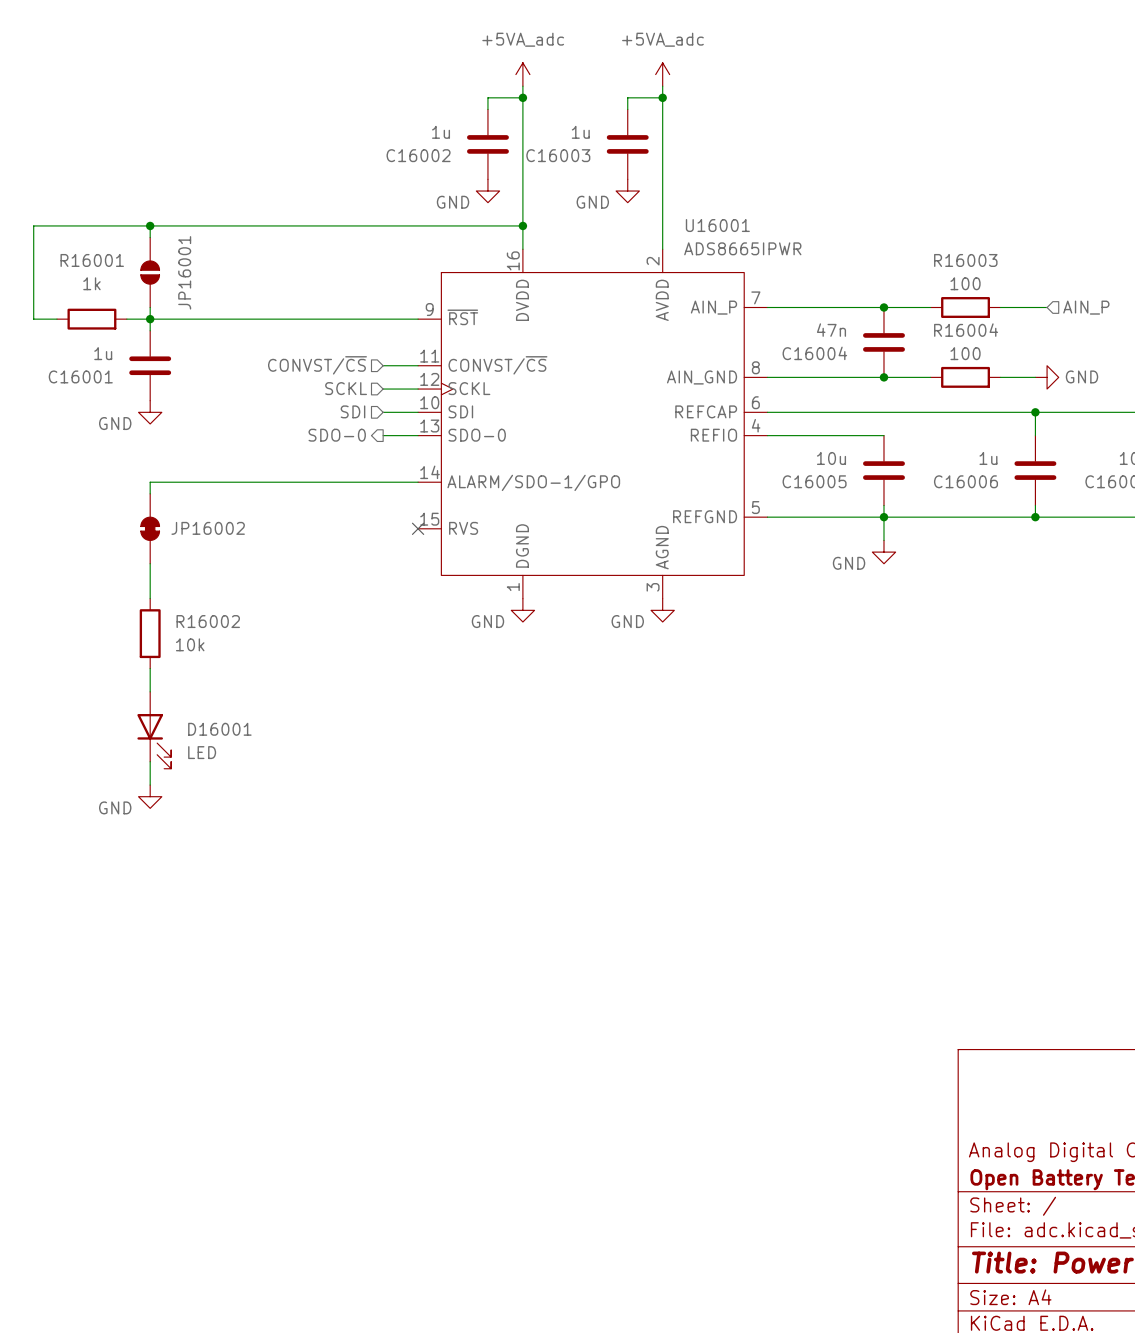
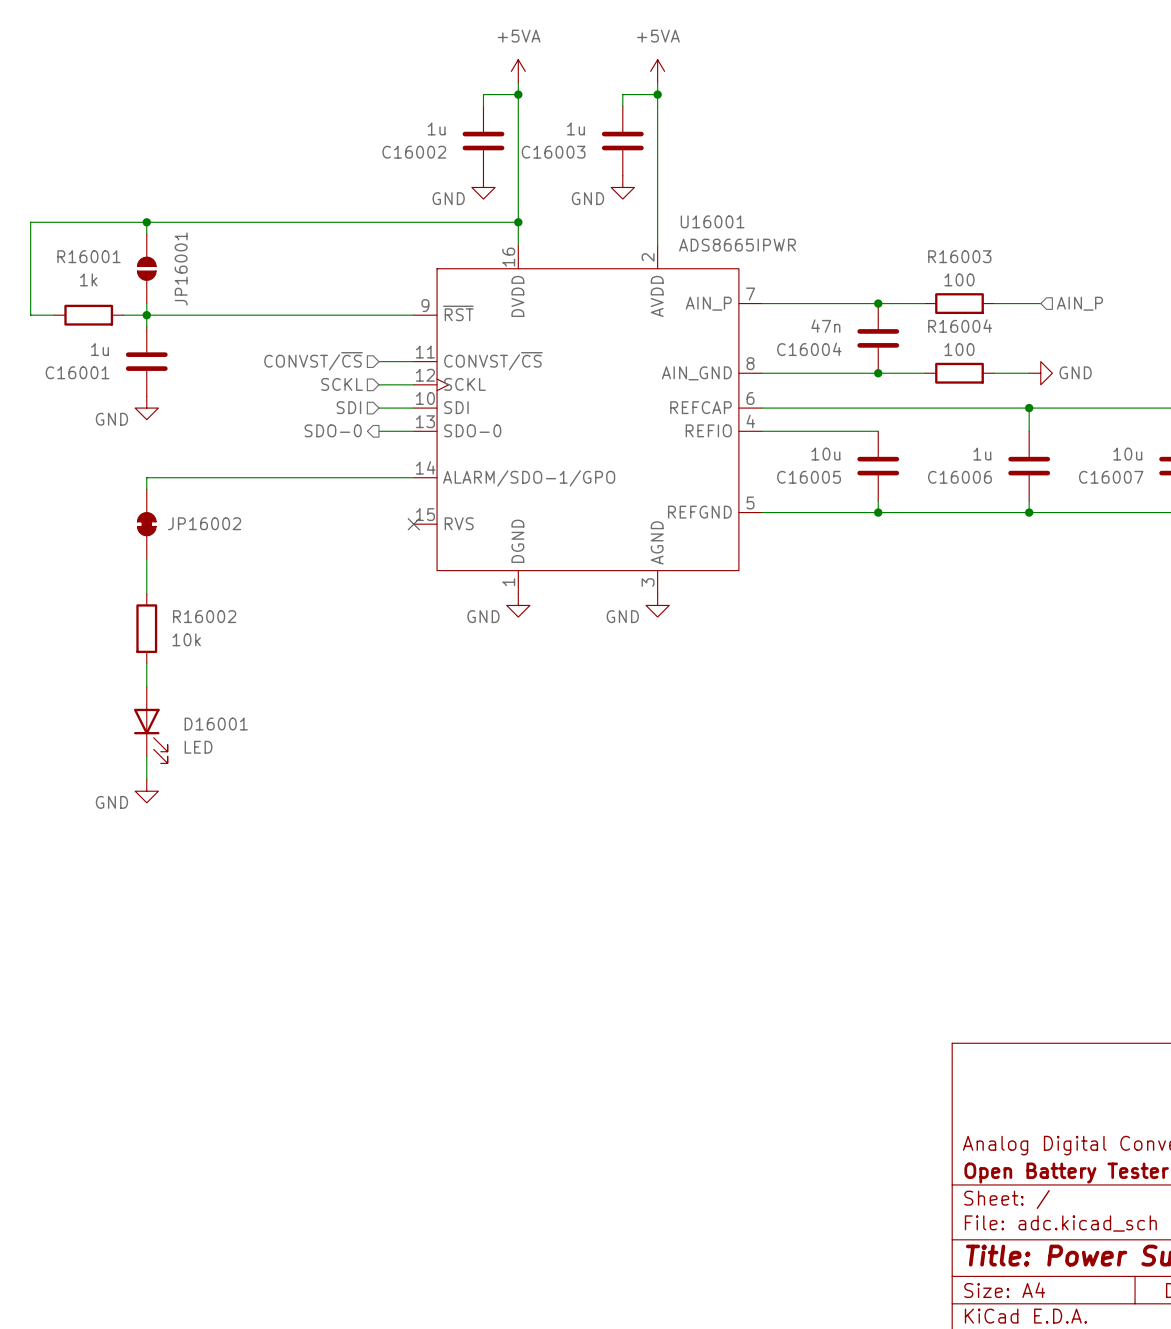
power symbol: +5VA_adc (522, 74) -> +5VA (518, 71)
power symbol: +5VA_adc (662, 74) -> +5VA (657, 71)
wire: (883, 517) (883, 540) -> none
power symbol: GND (883, 552) -> none

